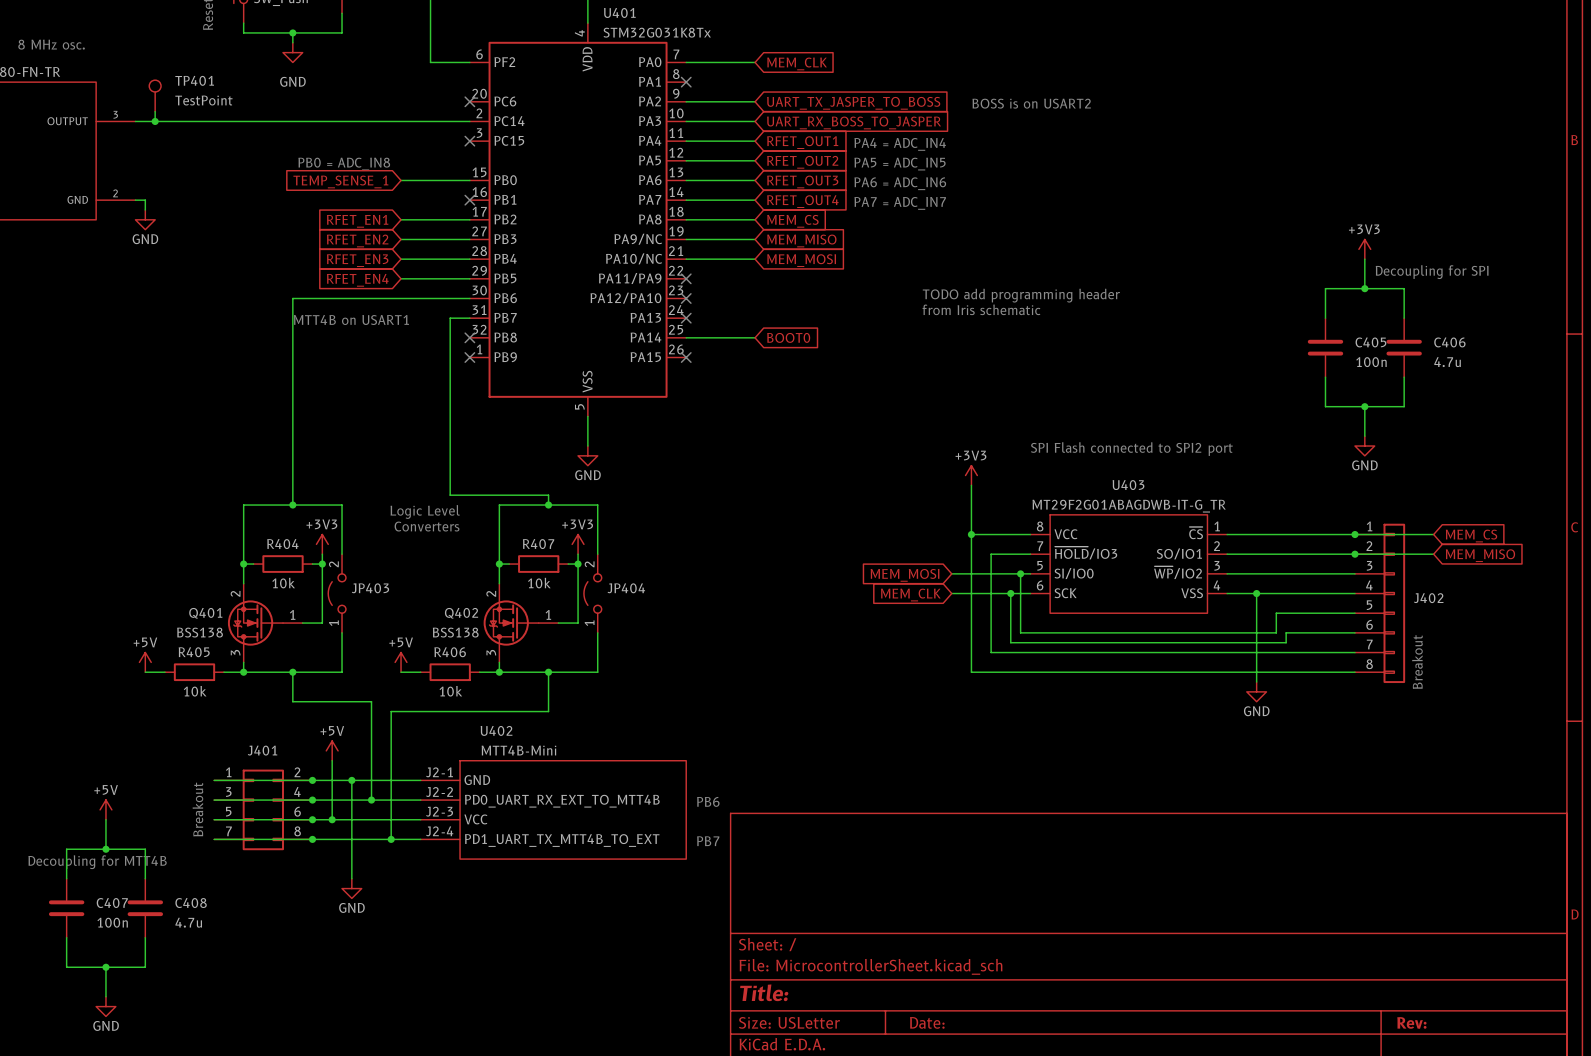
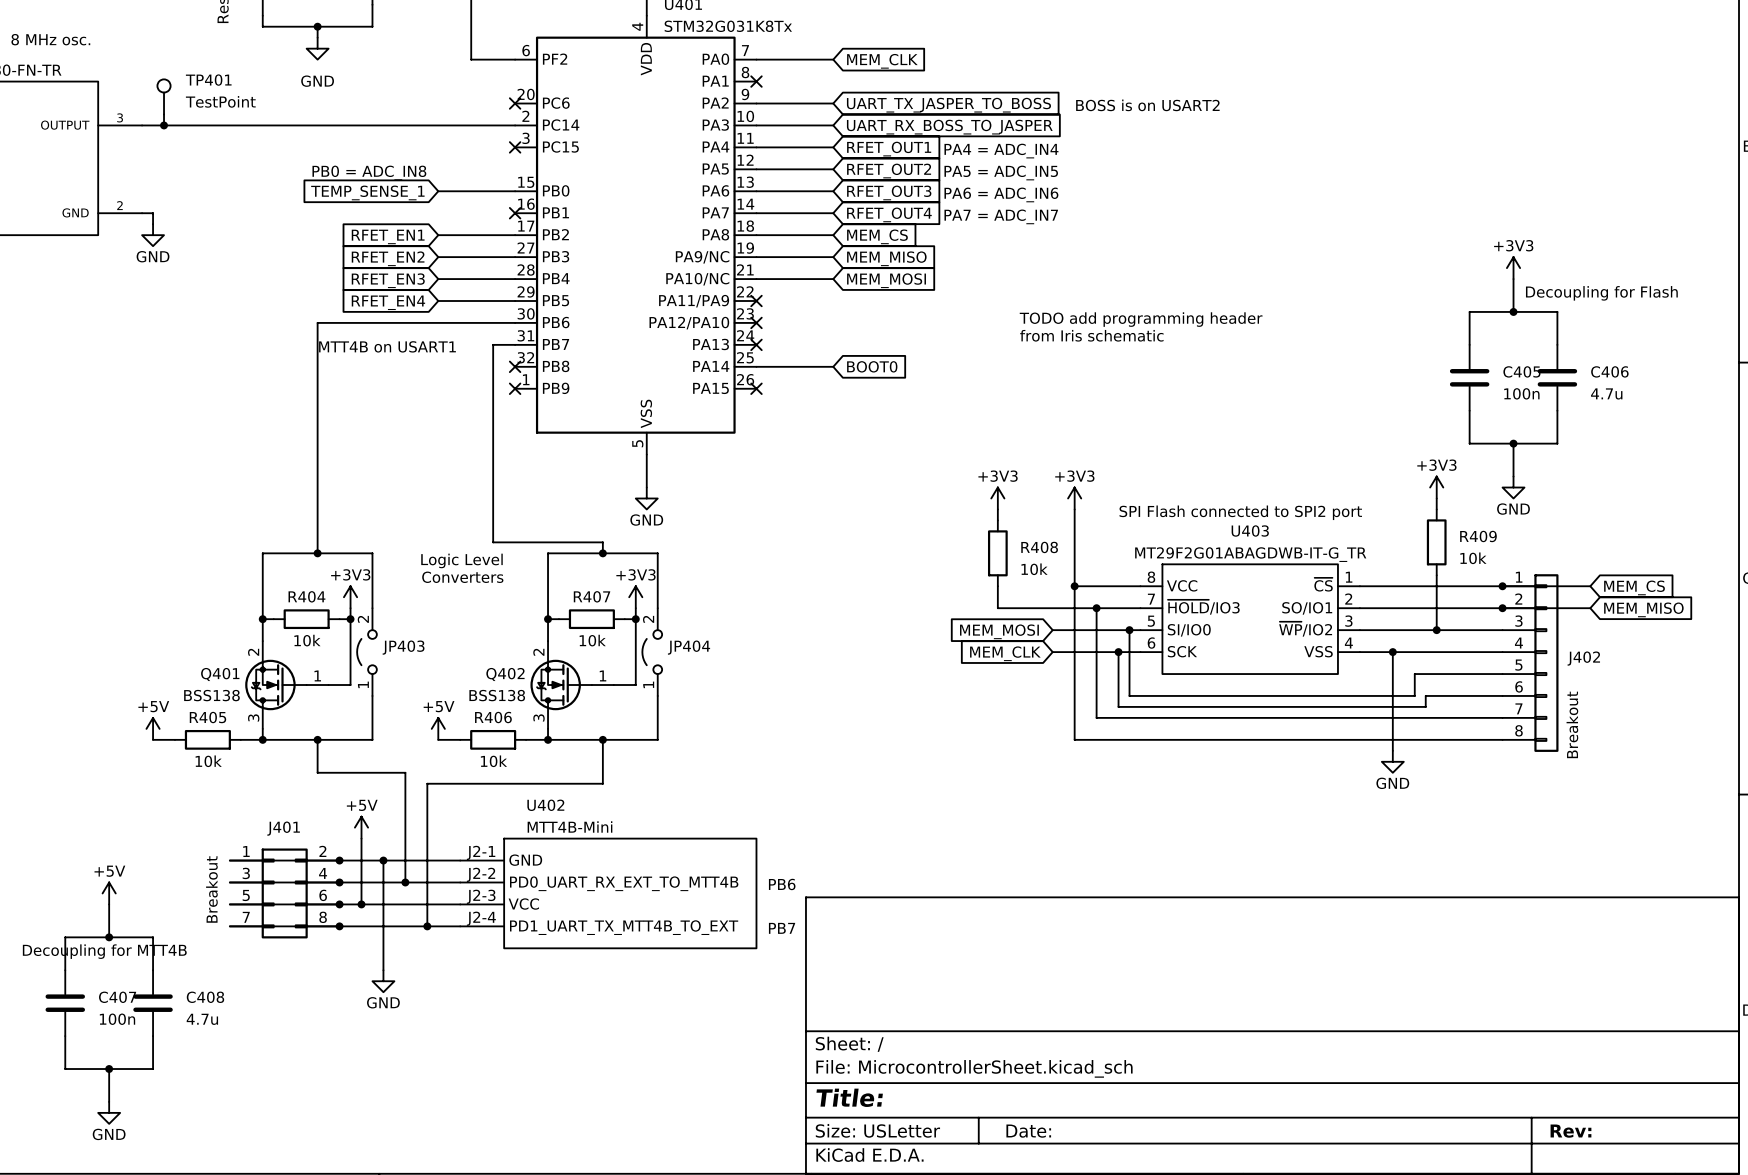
text: Decoupling for SPI (1432, 272) -> Decoupling for Flash (1601, 293)
power symbol: none -> +3V3 (1436, 487)
text position: SPI Flash connected to SPI2 port (1131, 449) -> SPI Flash connected to SPI2 port (1240, 512)
power symbol: none -> +3V3 (997, 498)
wire: none -> (1436, 498) (1436, 509)
wire: none -> (997, 509) (997, 520)
power symbol position: +3V3 (971, 475) -> +3V3 (1074, 498)
R409: none -> 10k (1436, 542)
R408: none -> 10k (997, 553)
wire: none -> (1436, 575) (1436, 630)
wire: none -> (997, 586) (997, 608) (1096, 608)
junction: none -> (1096, 608)
junction: none -> (1436, 630)

